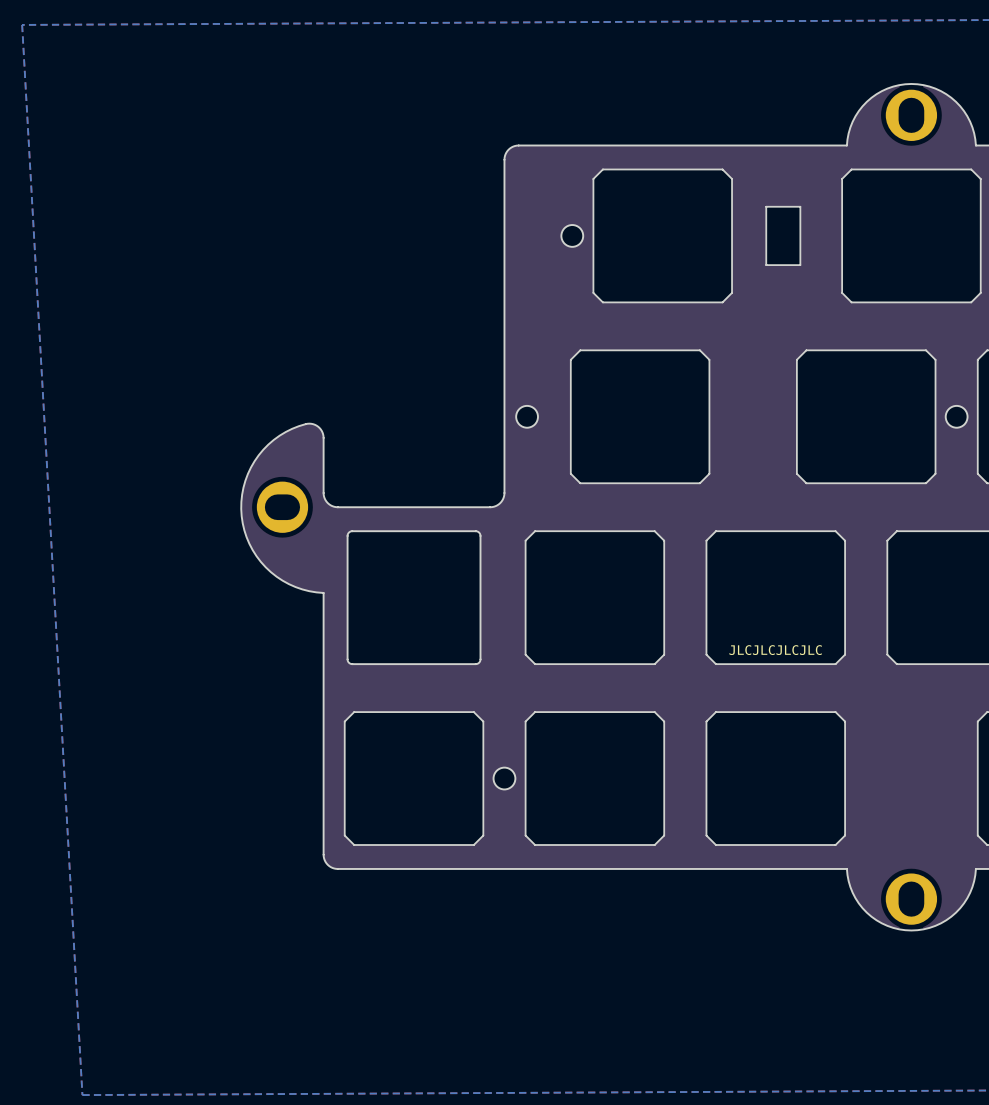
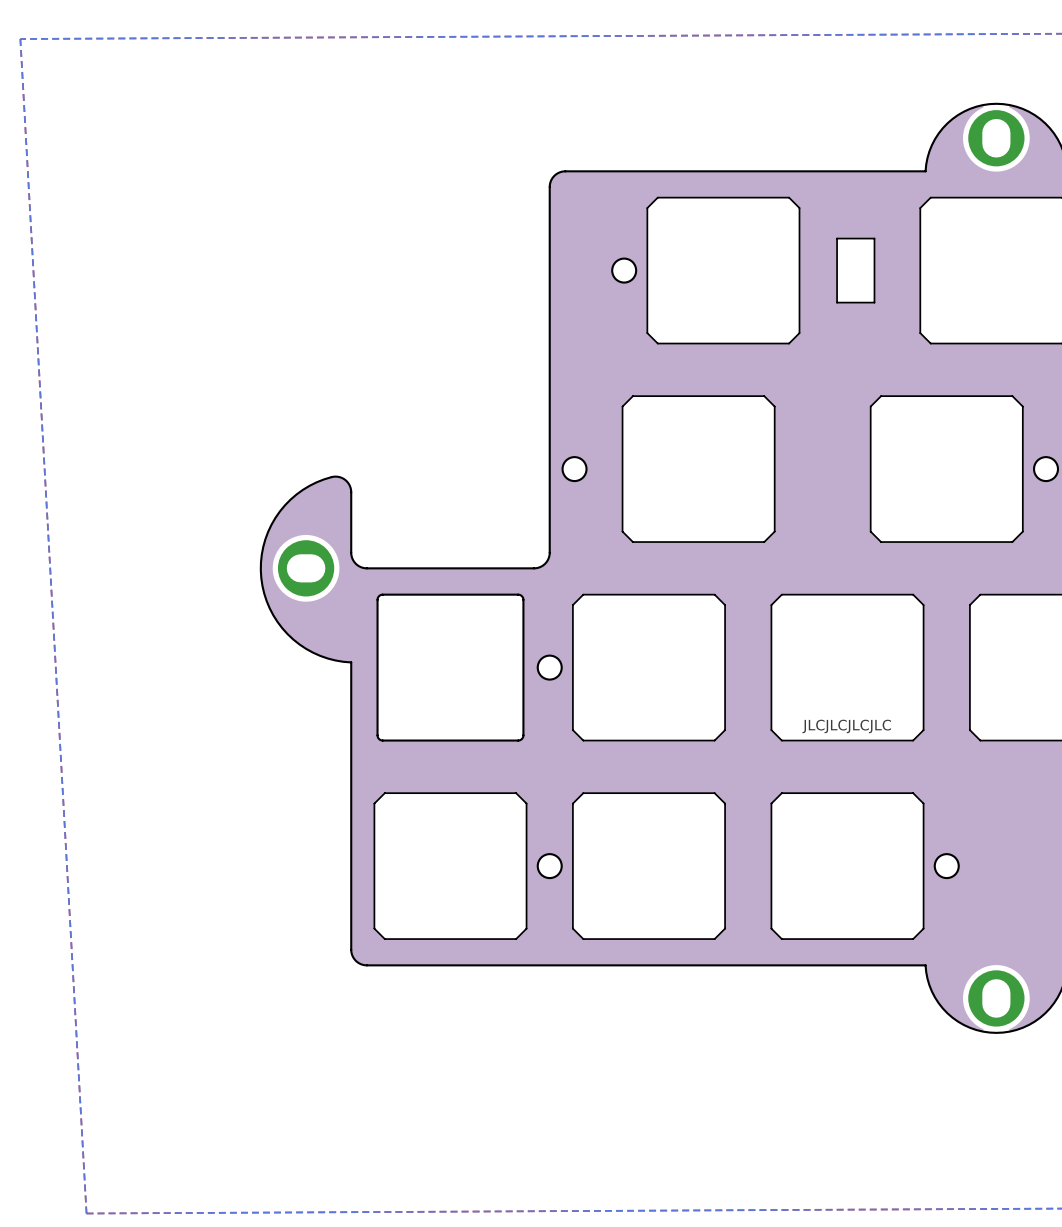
round board edge: none -> [536, 654, 563, 681]
round board edge: none -> [933, 853, 960, 880]

